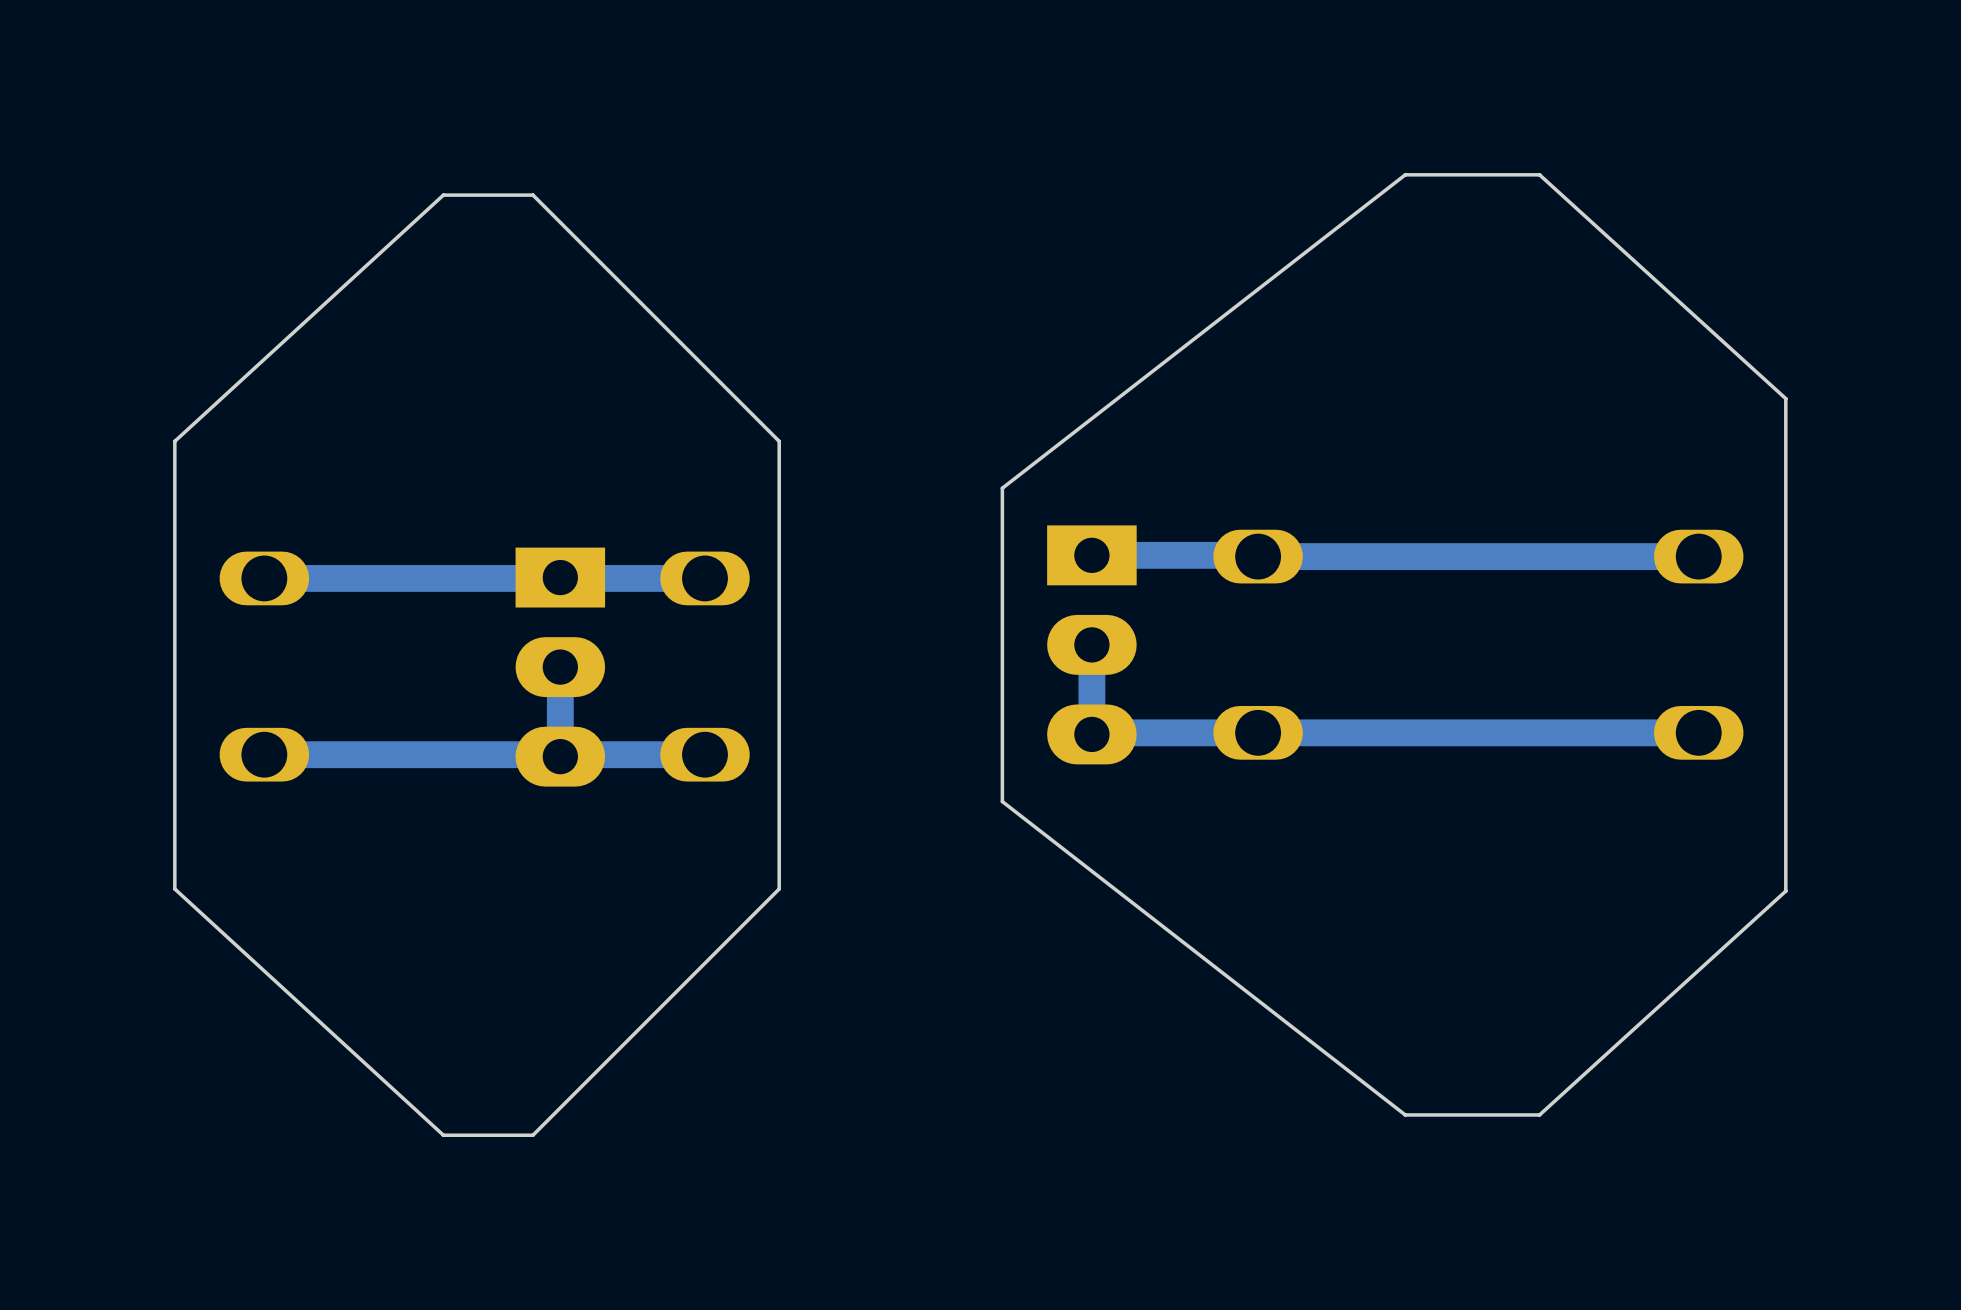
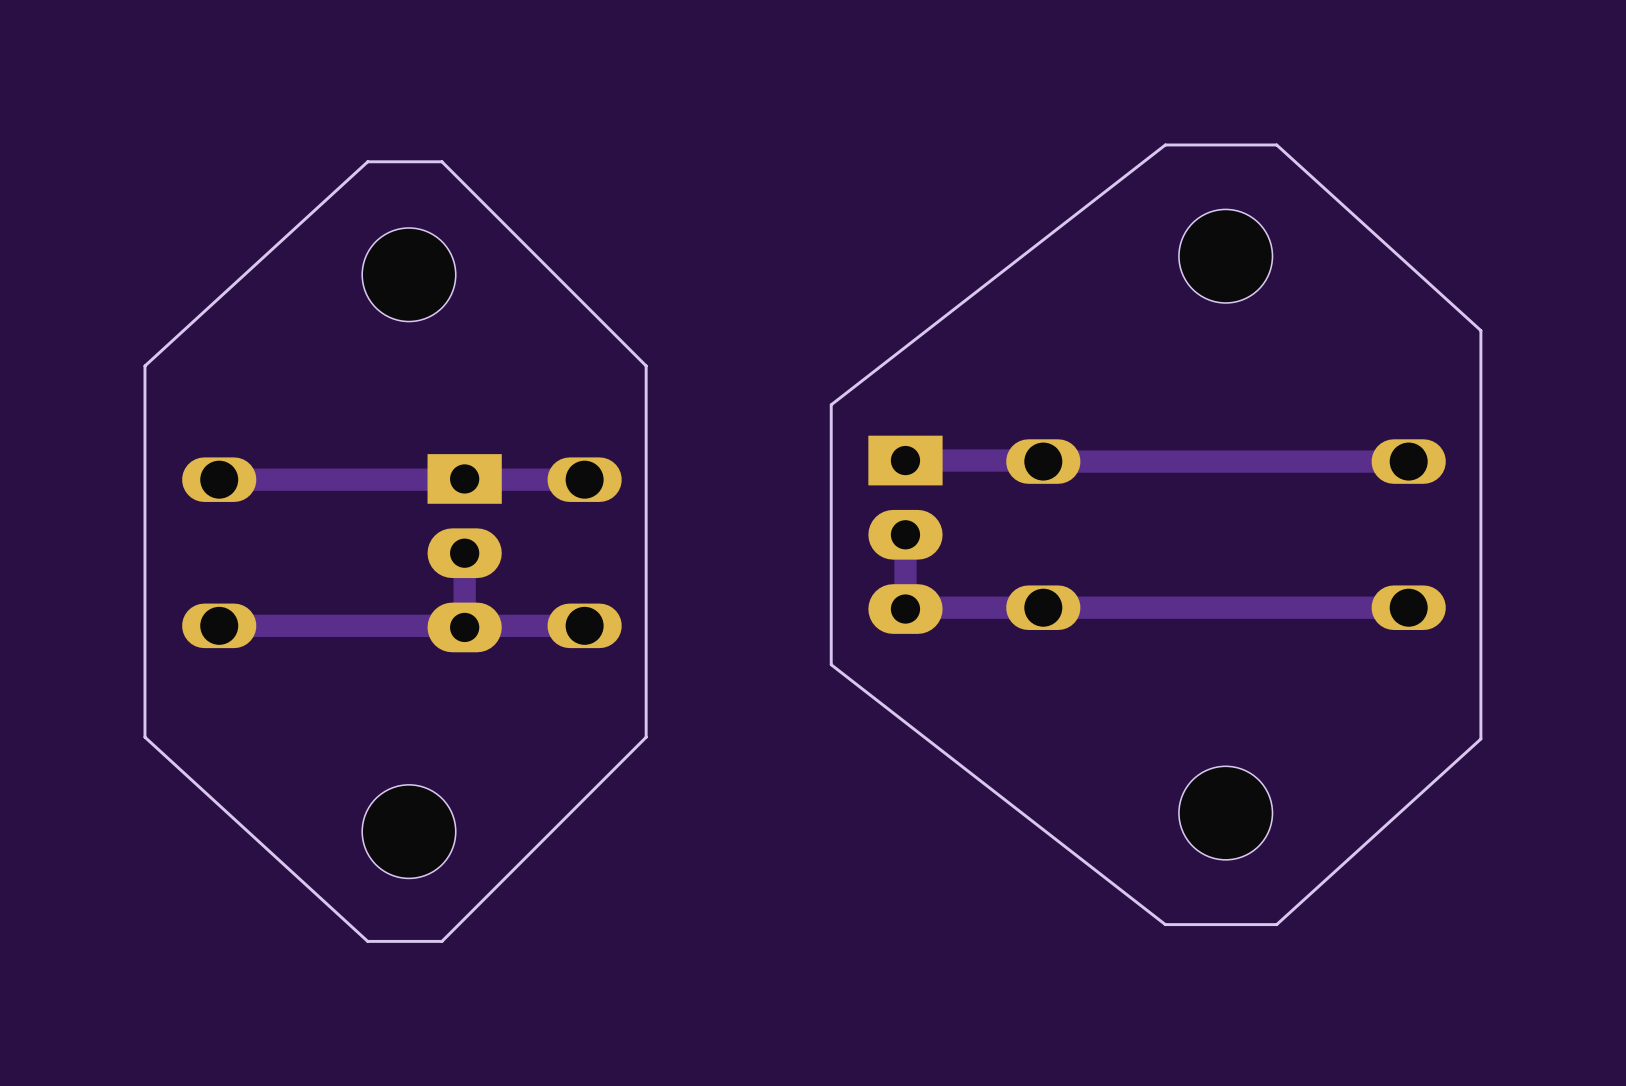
part: none -> (1225, 256)
part: none -> (408, 274)
part: none -> (1225, 813)
part: none -> (408, 831)

